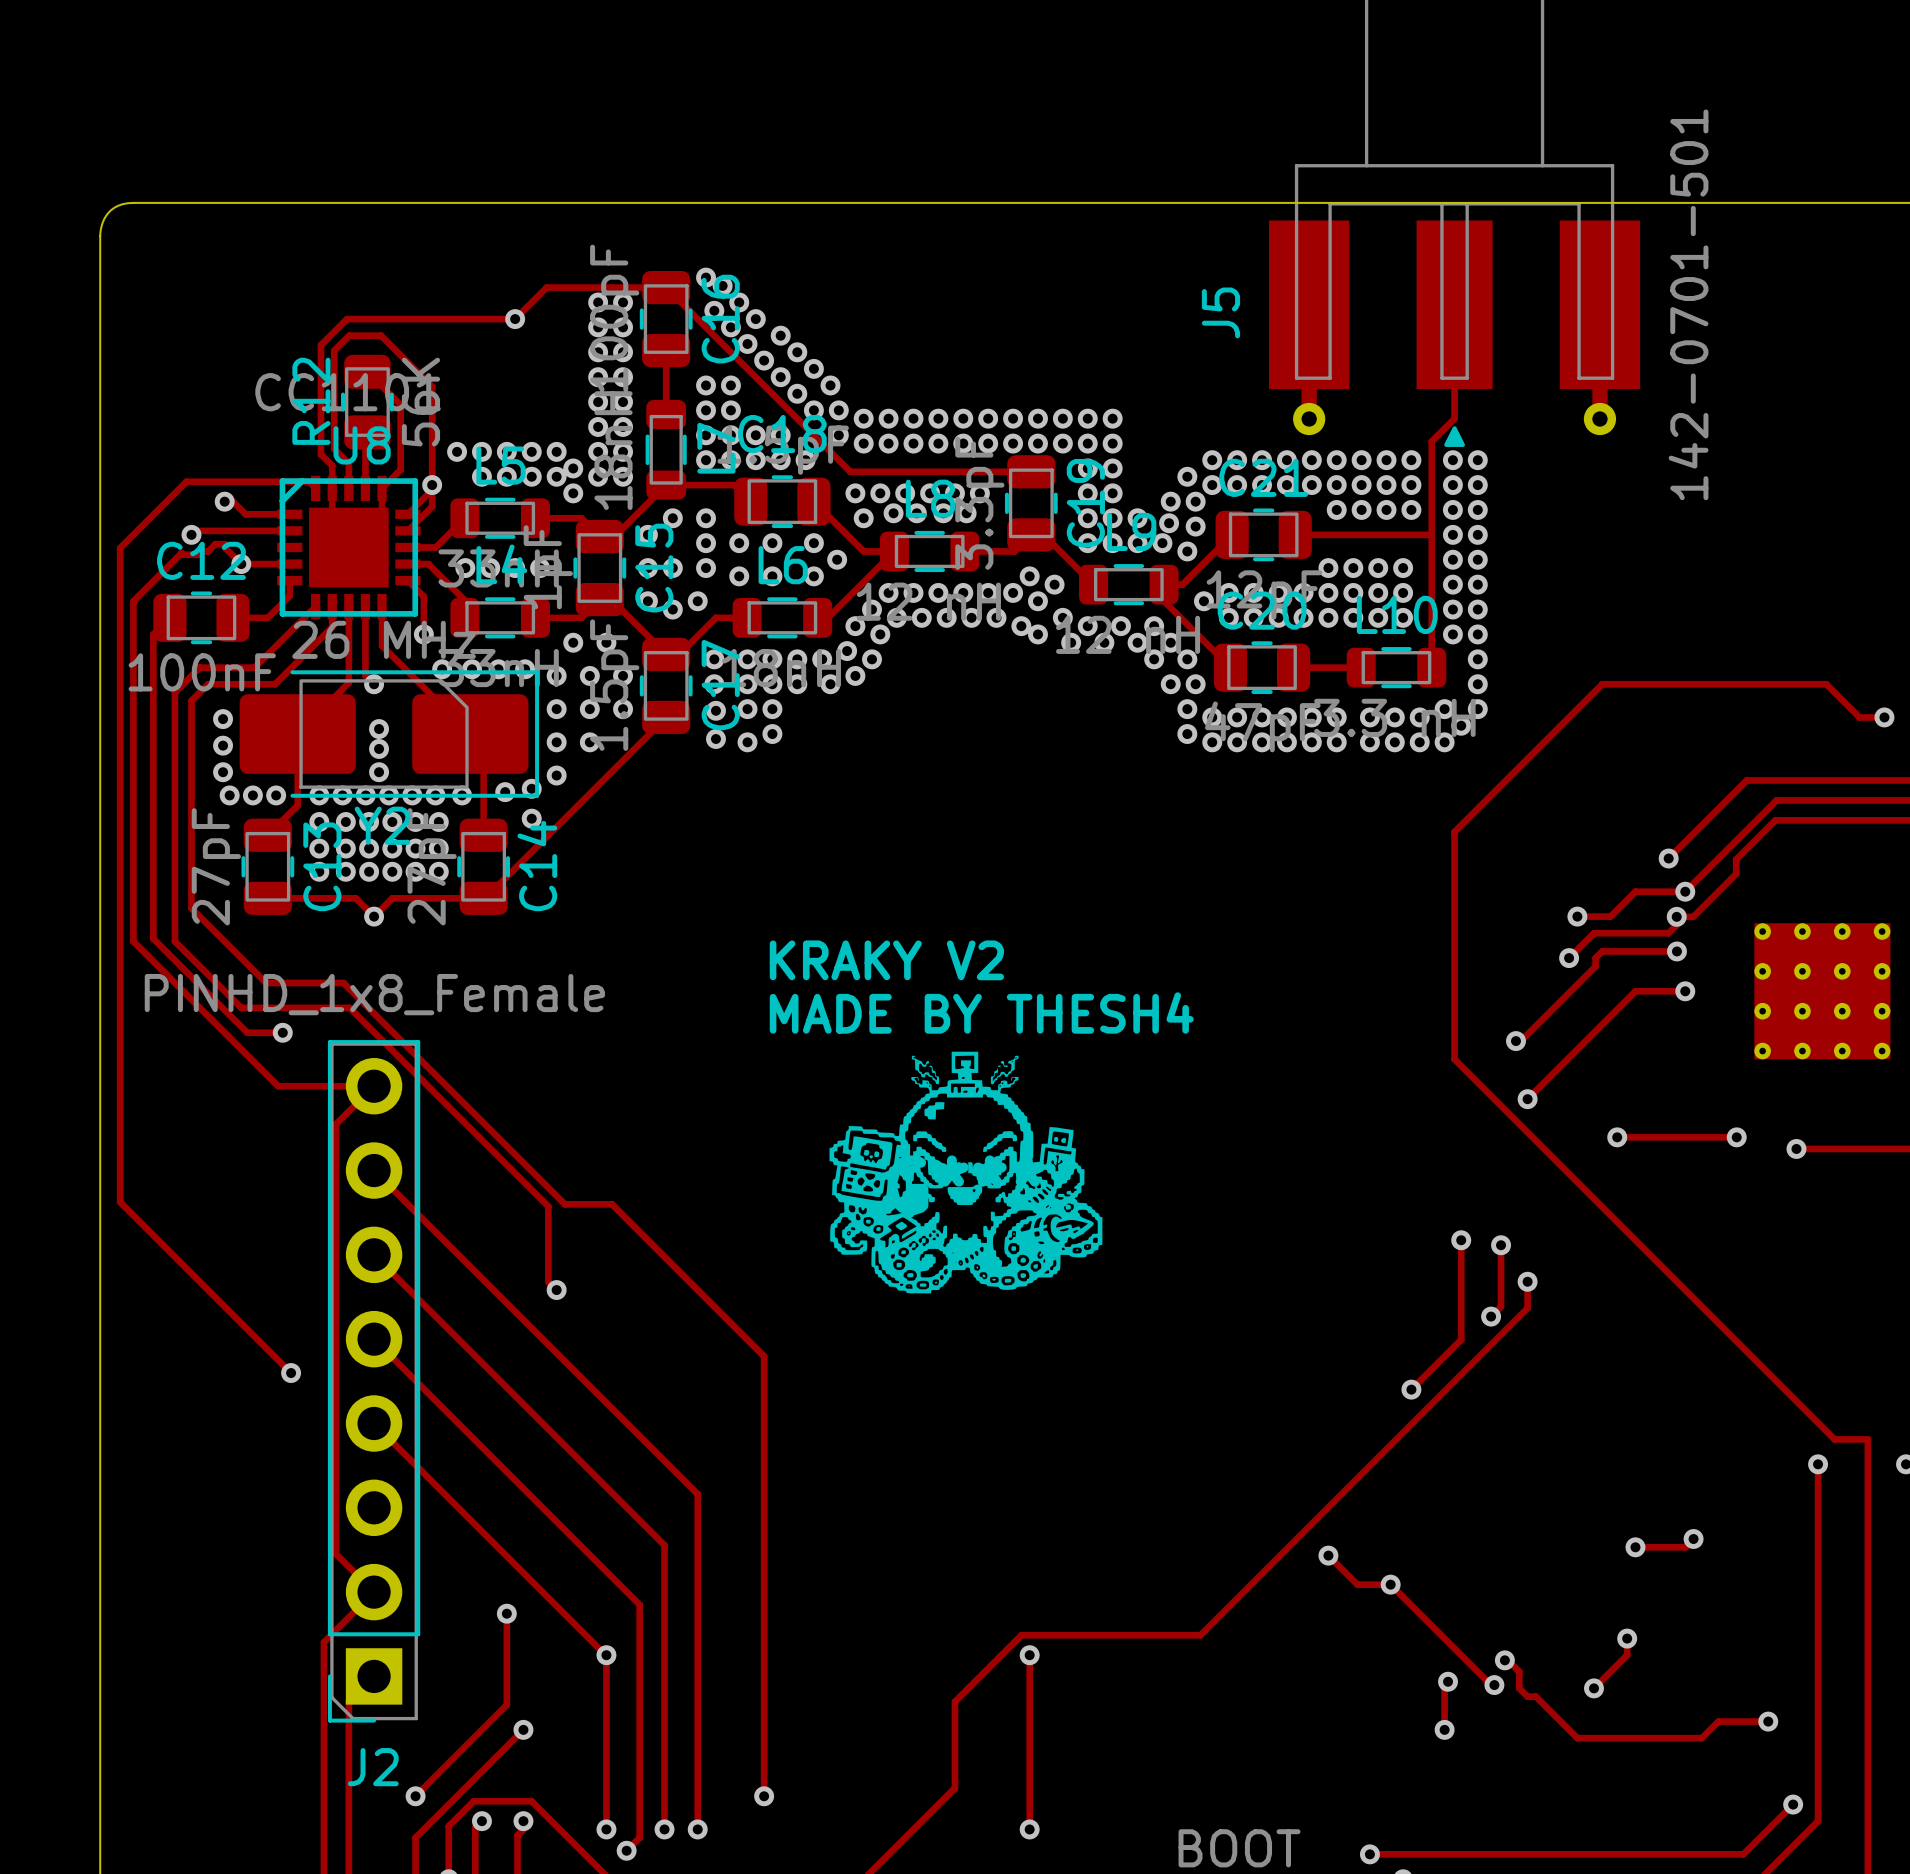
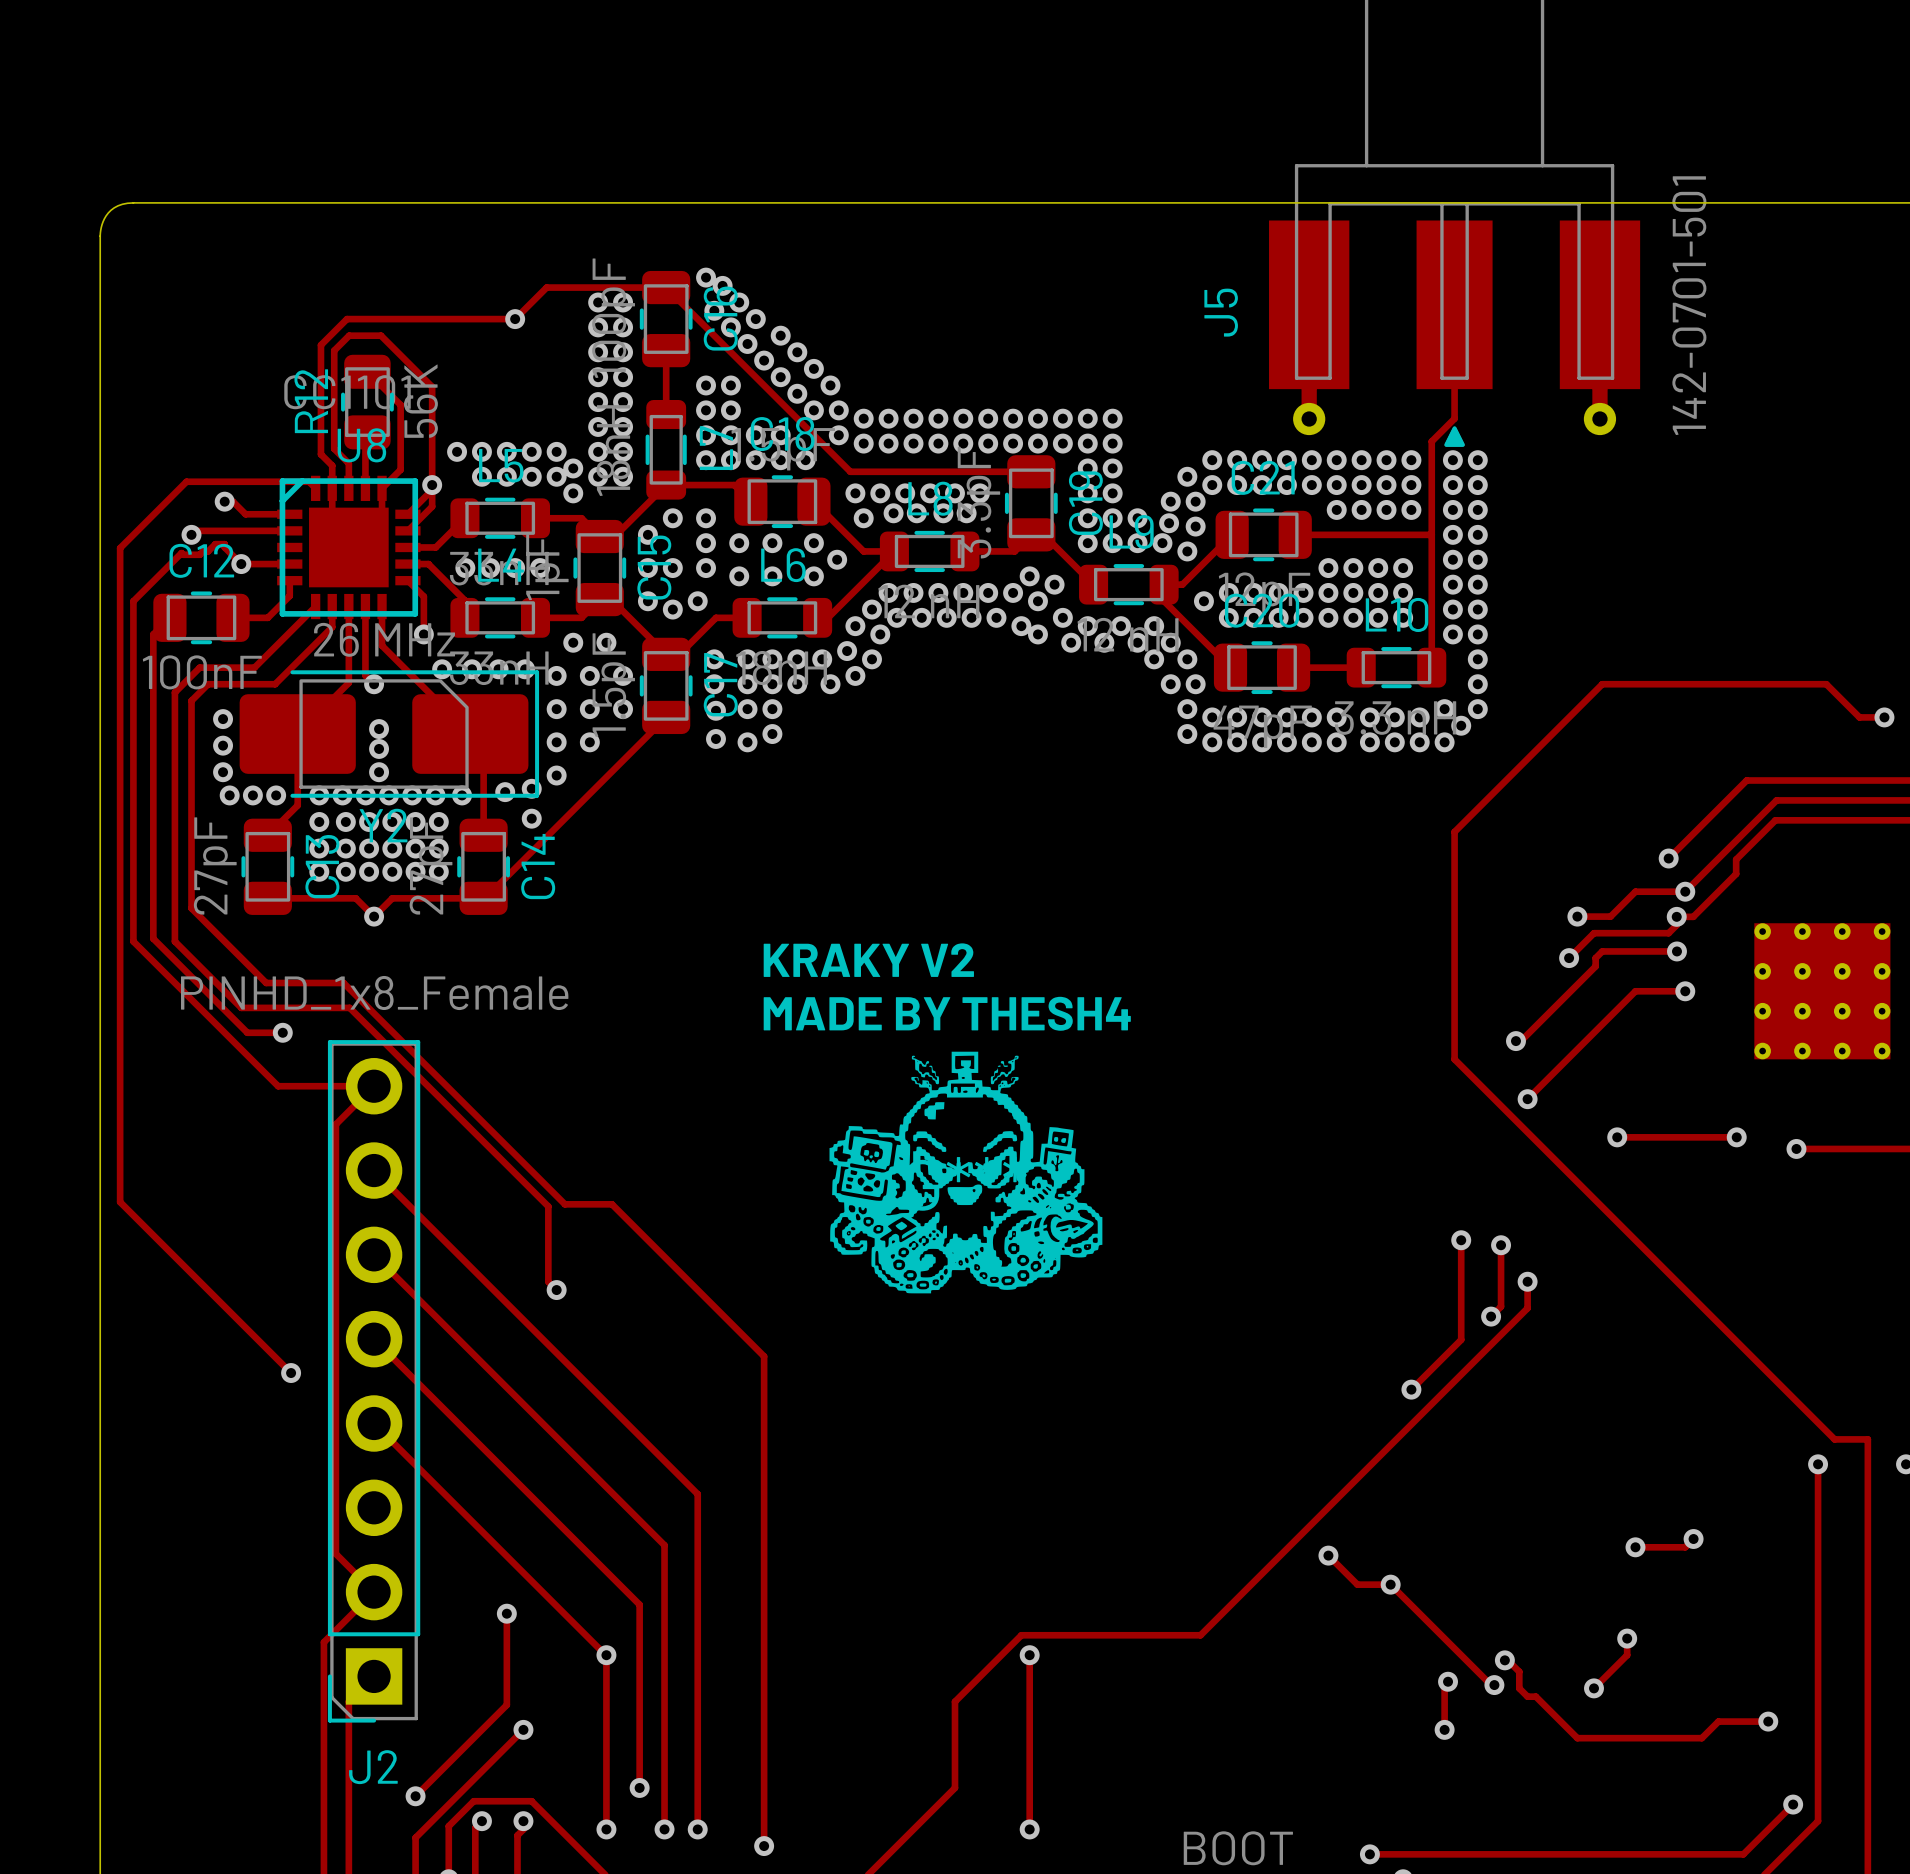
track: (639, 1787) (639, 1837) (626, 1850) -> none
via: none -> (639, 1787)
track: none -> (764, 1796) (764, 1846)
via position: (764, 1796) -> (764, 1846)
via: (626, 1850) -> none

